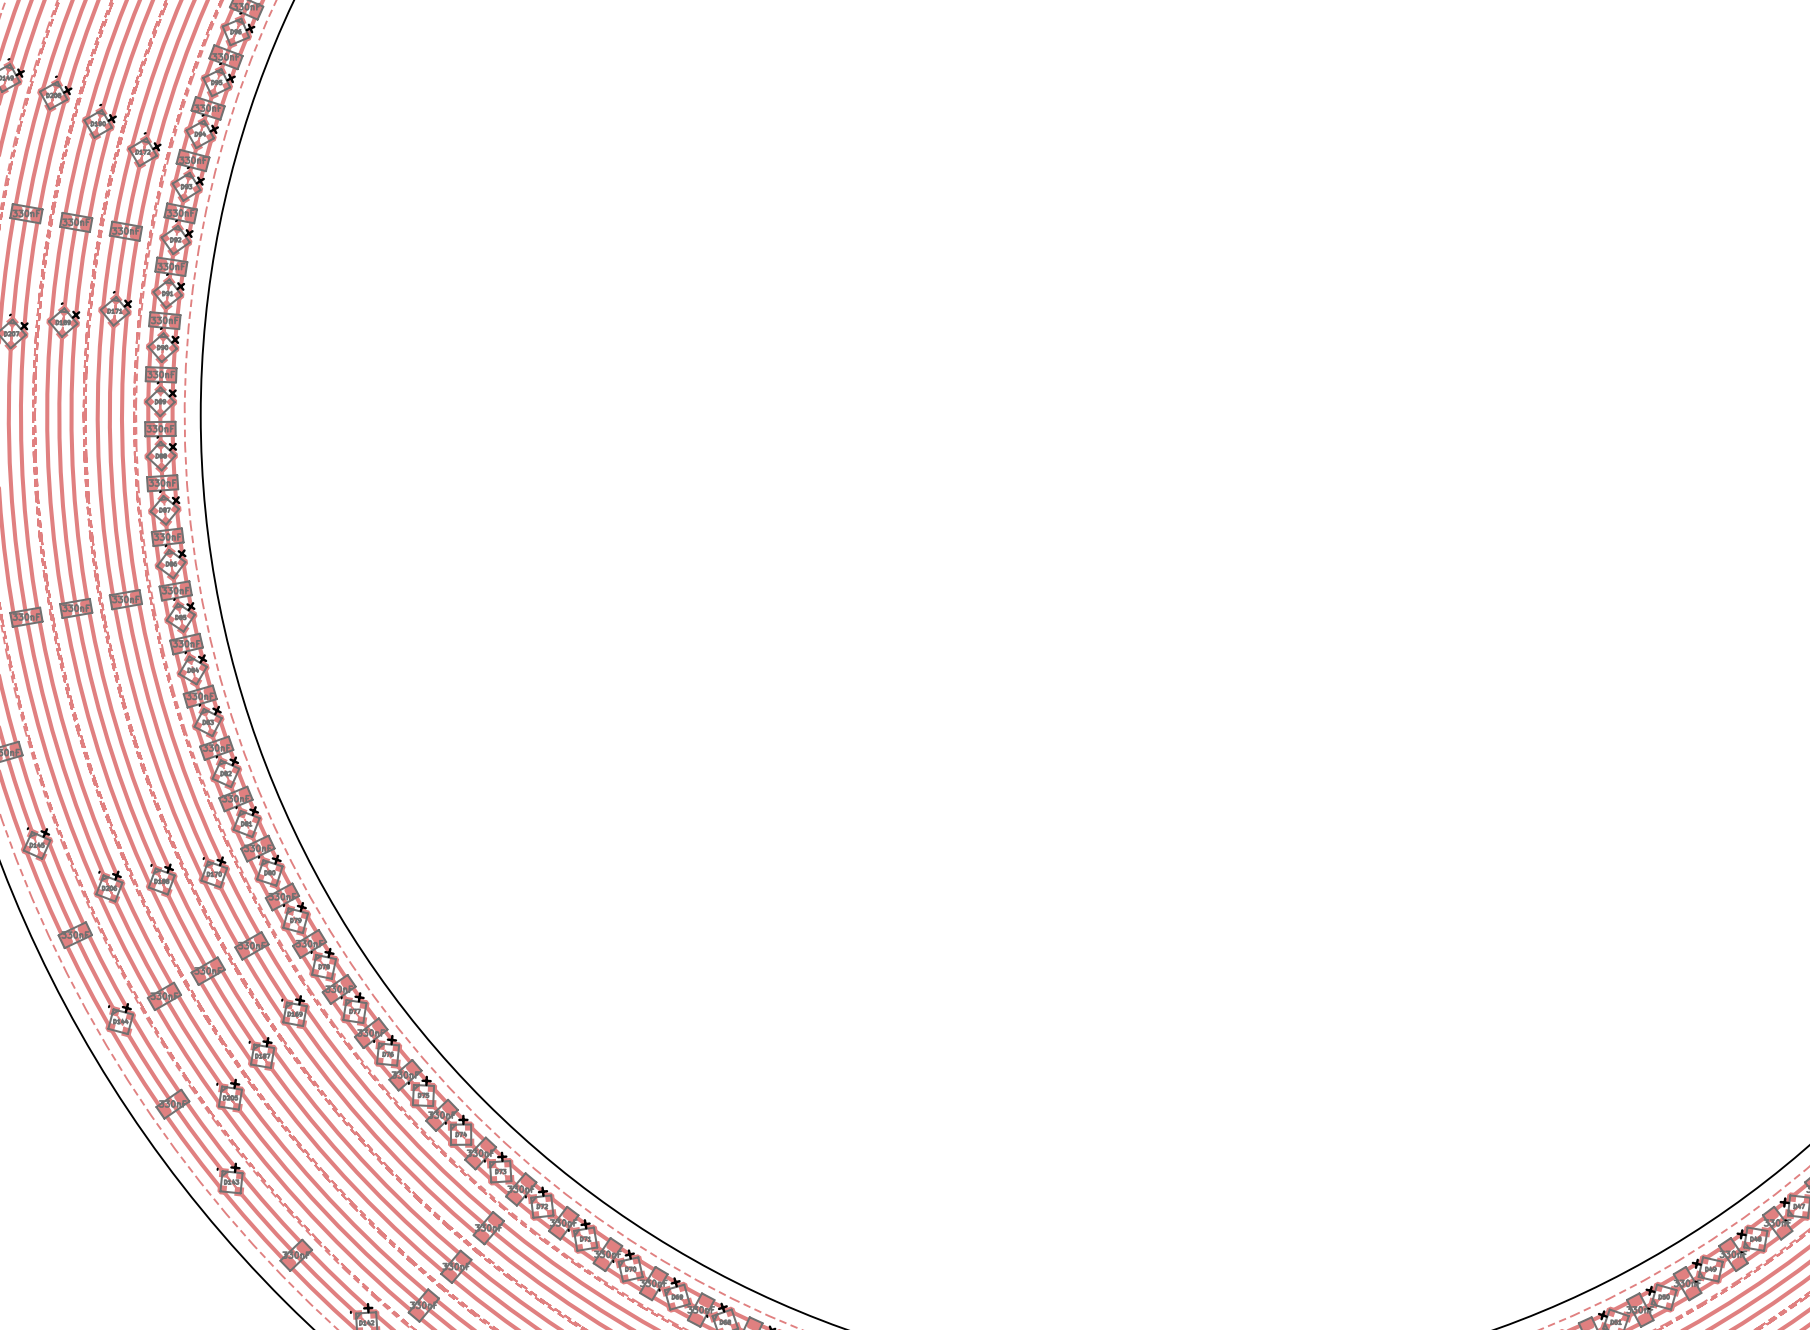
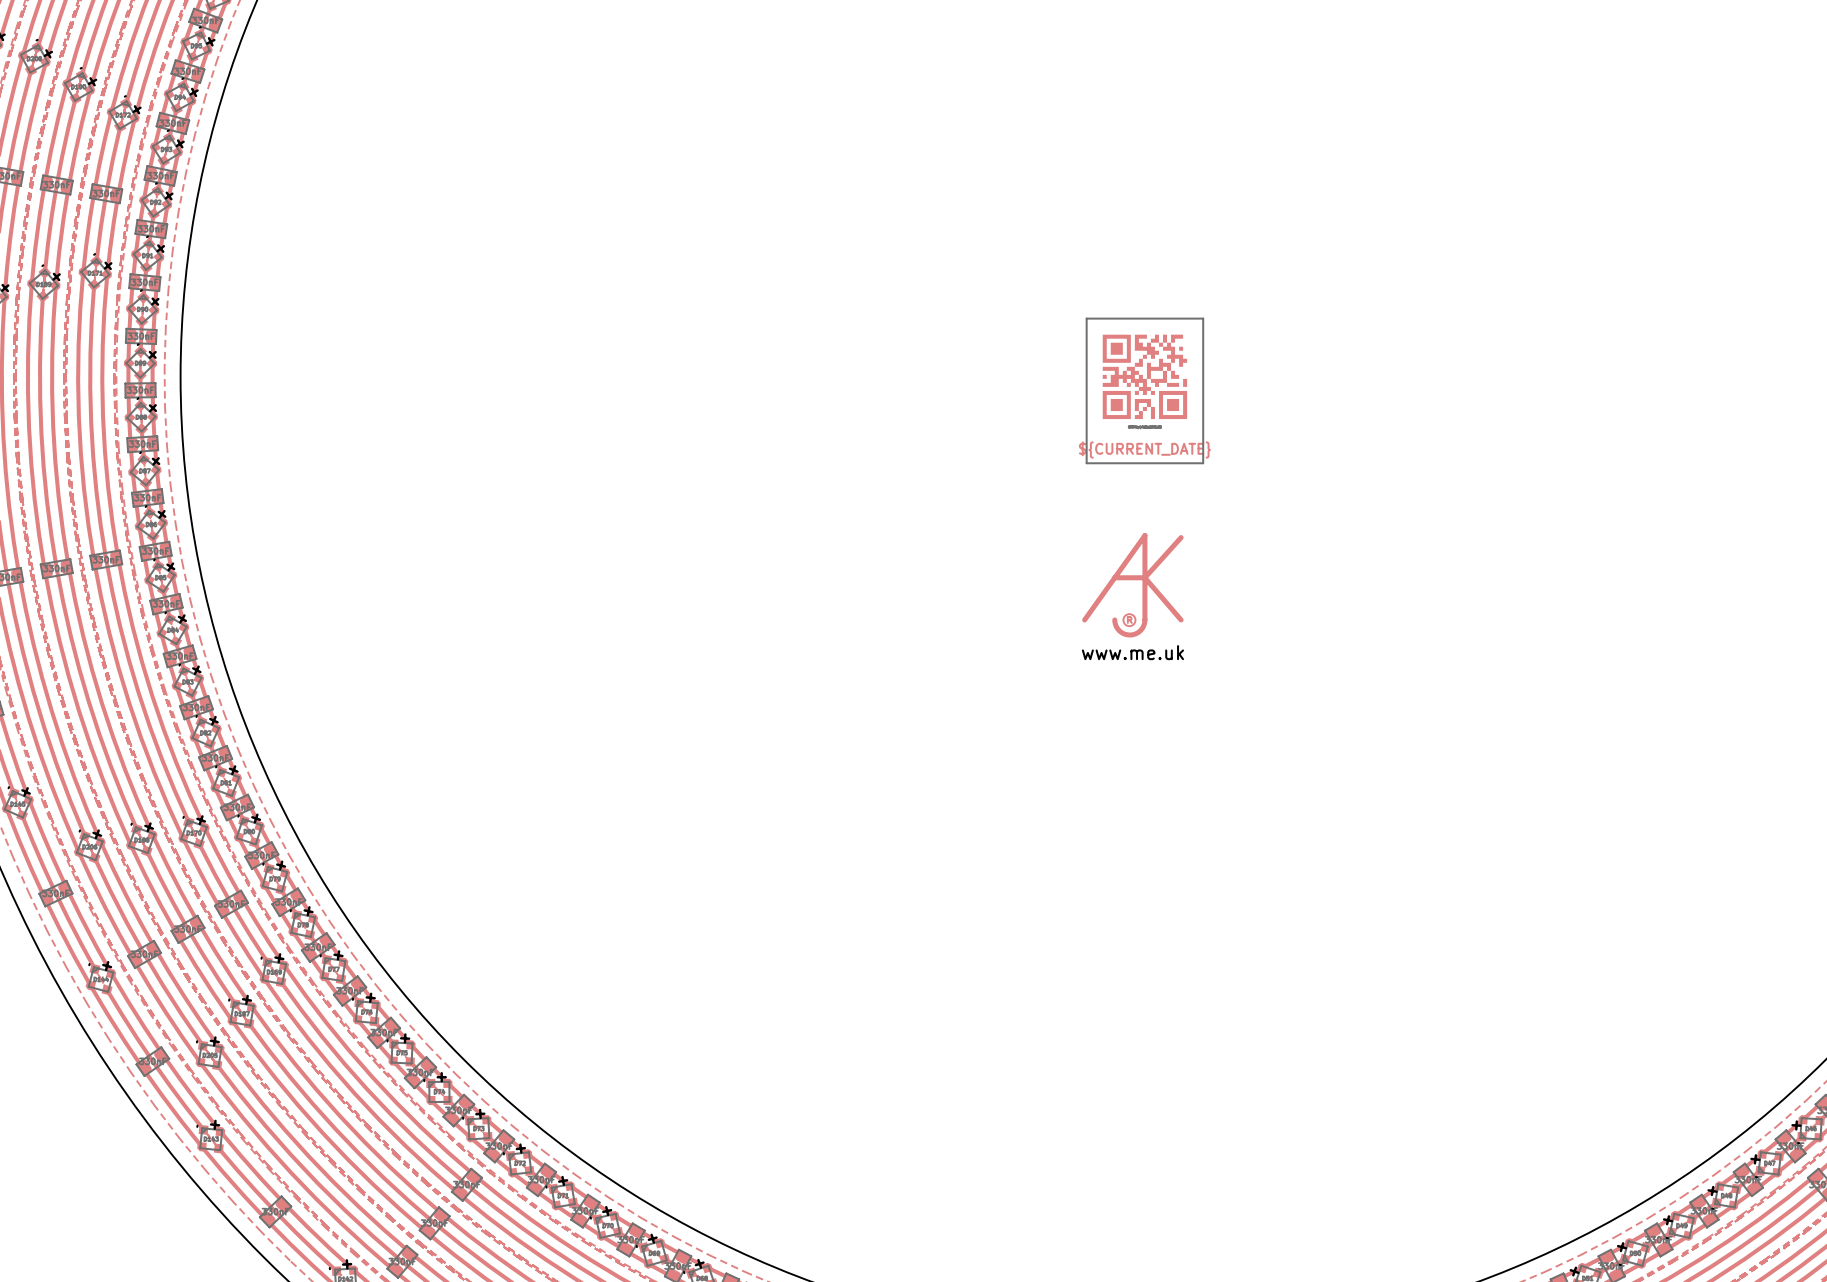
part: none -> (1144, 390)
drawing: none -> [1082, 533, 1184, 638]

